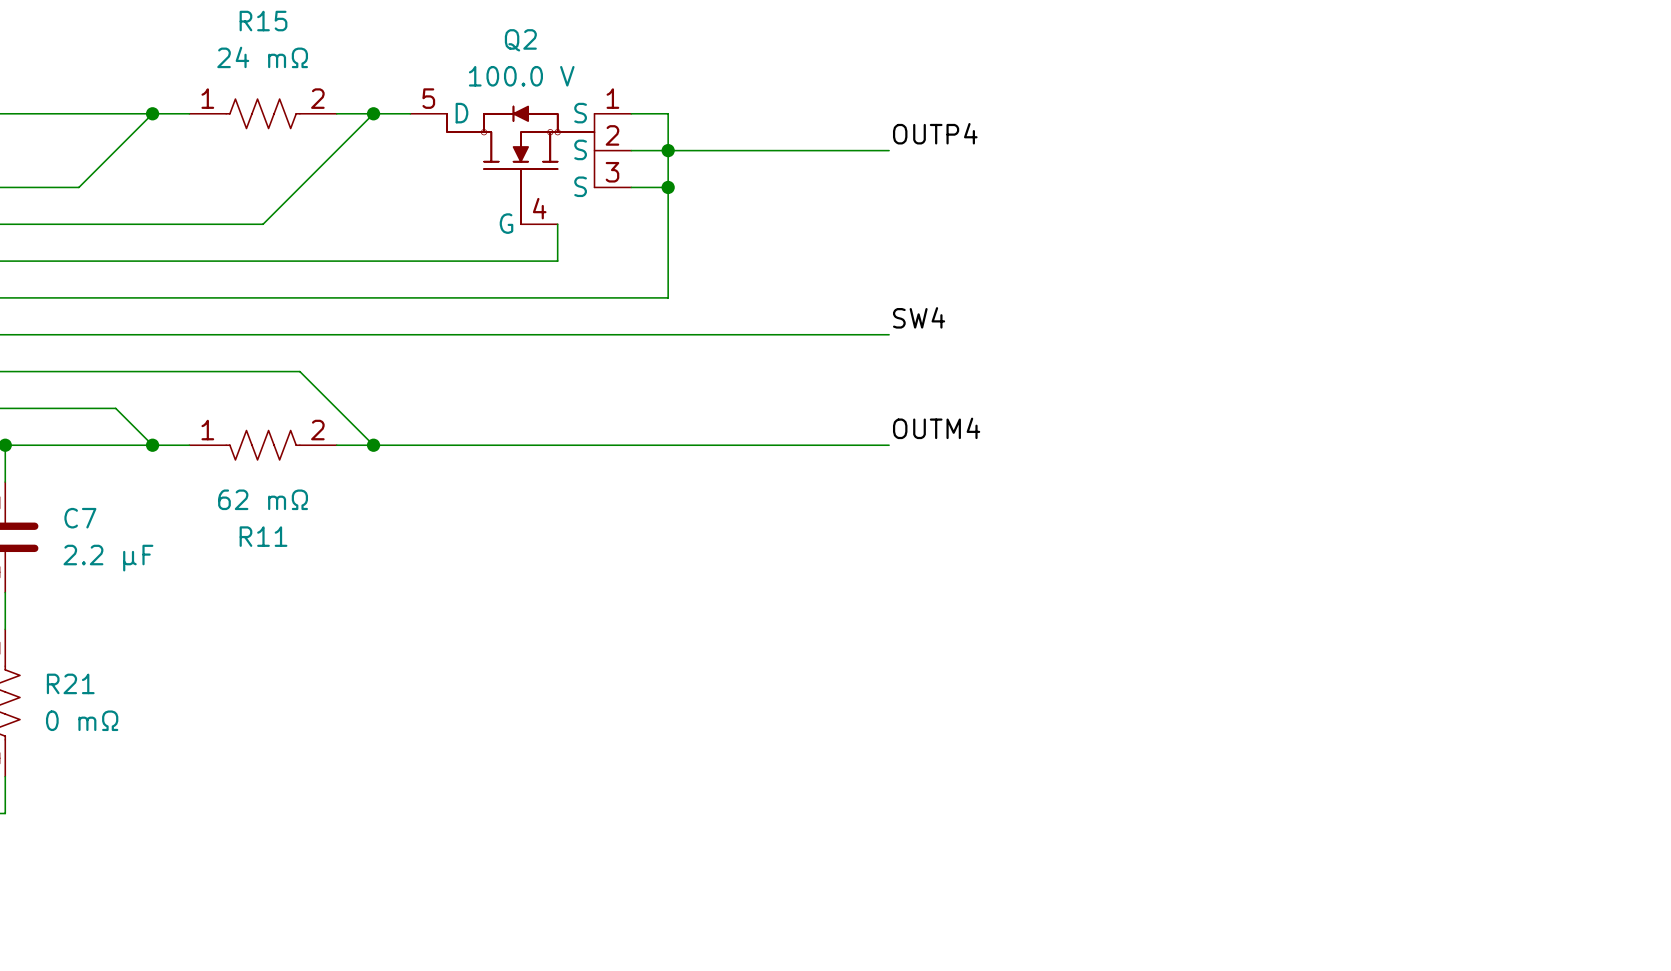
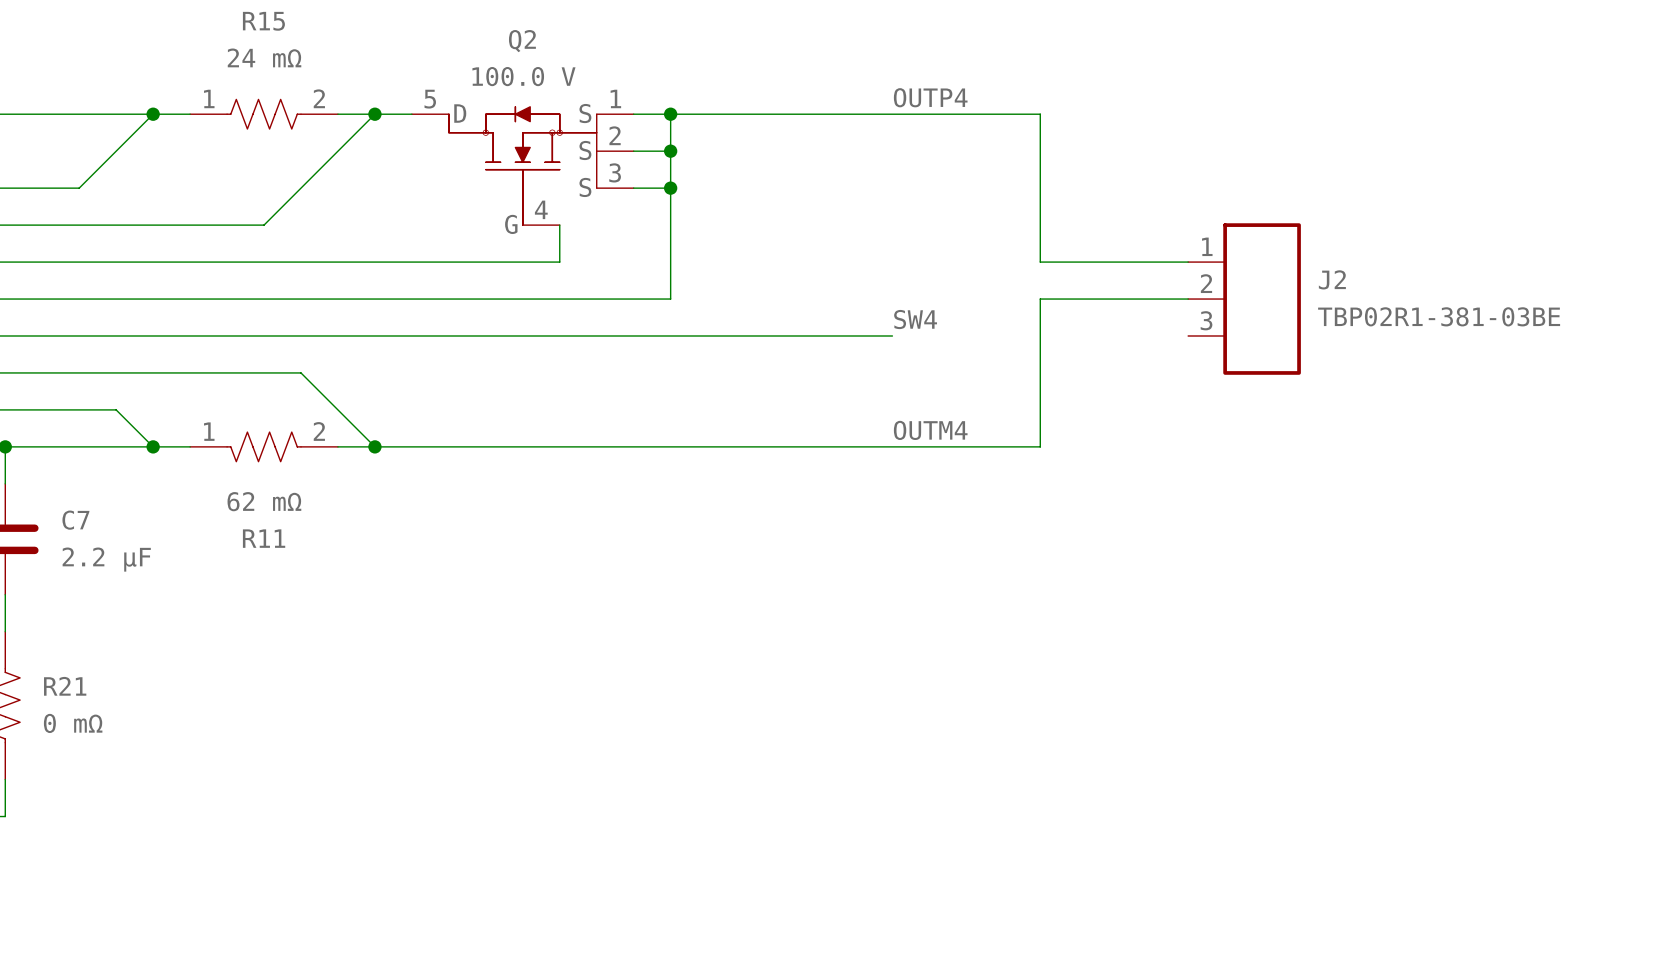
wire: none -> (670, 114) (1040, 114) (1040, 262) (1188, 262)
junction: none -> (670, 114)
label position: OUTP4 (935, 133) -> OUTP4 (930, 97)
wire: (668, 150) (889, 150) -> none
wire: none -> (1188, 299) (1040, 299) (1040, 446) (892, 446)
J2: none -> TBP02R1-381-03BE (1244, 299)

